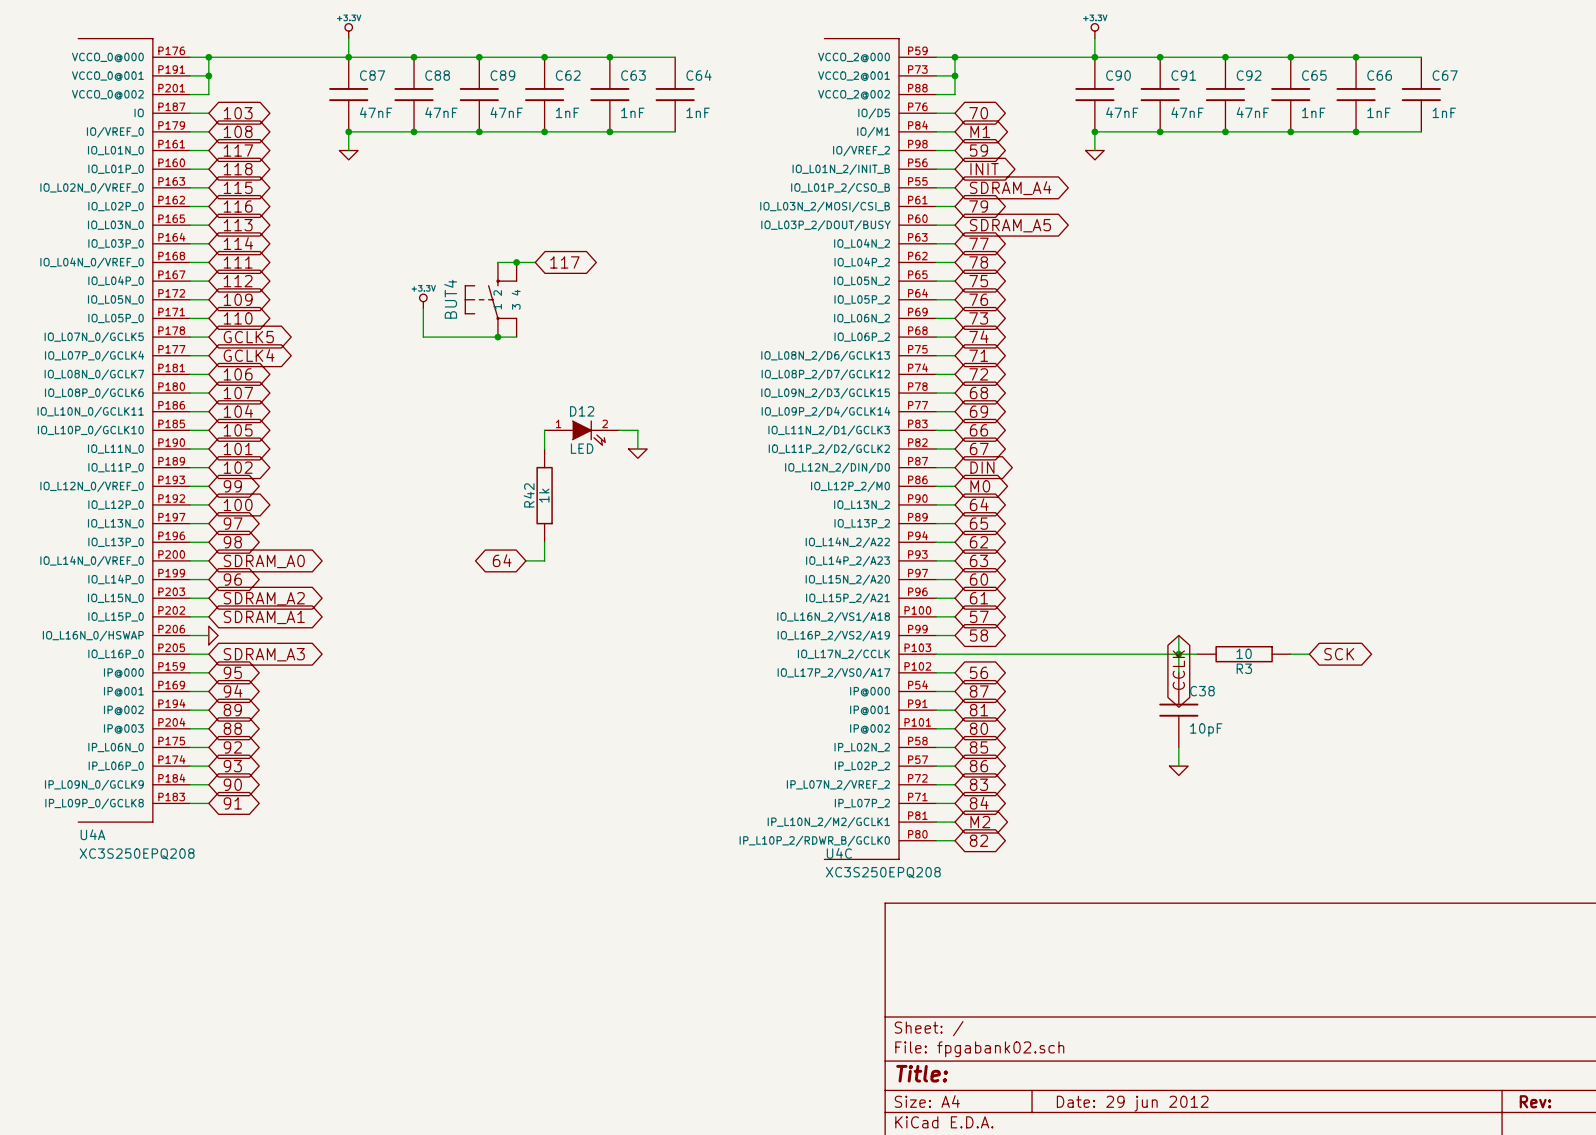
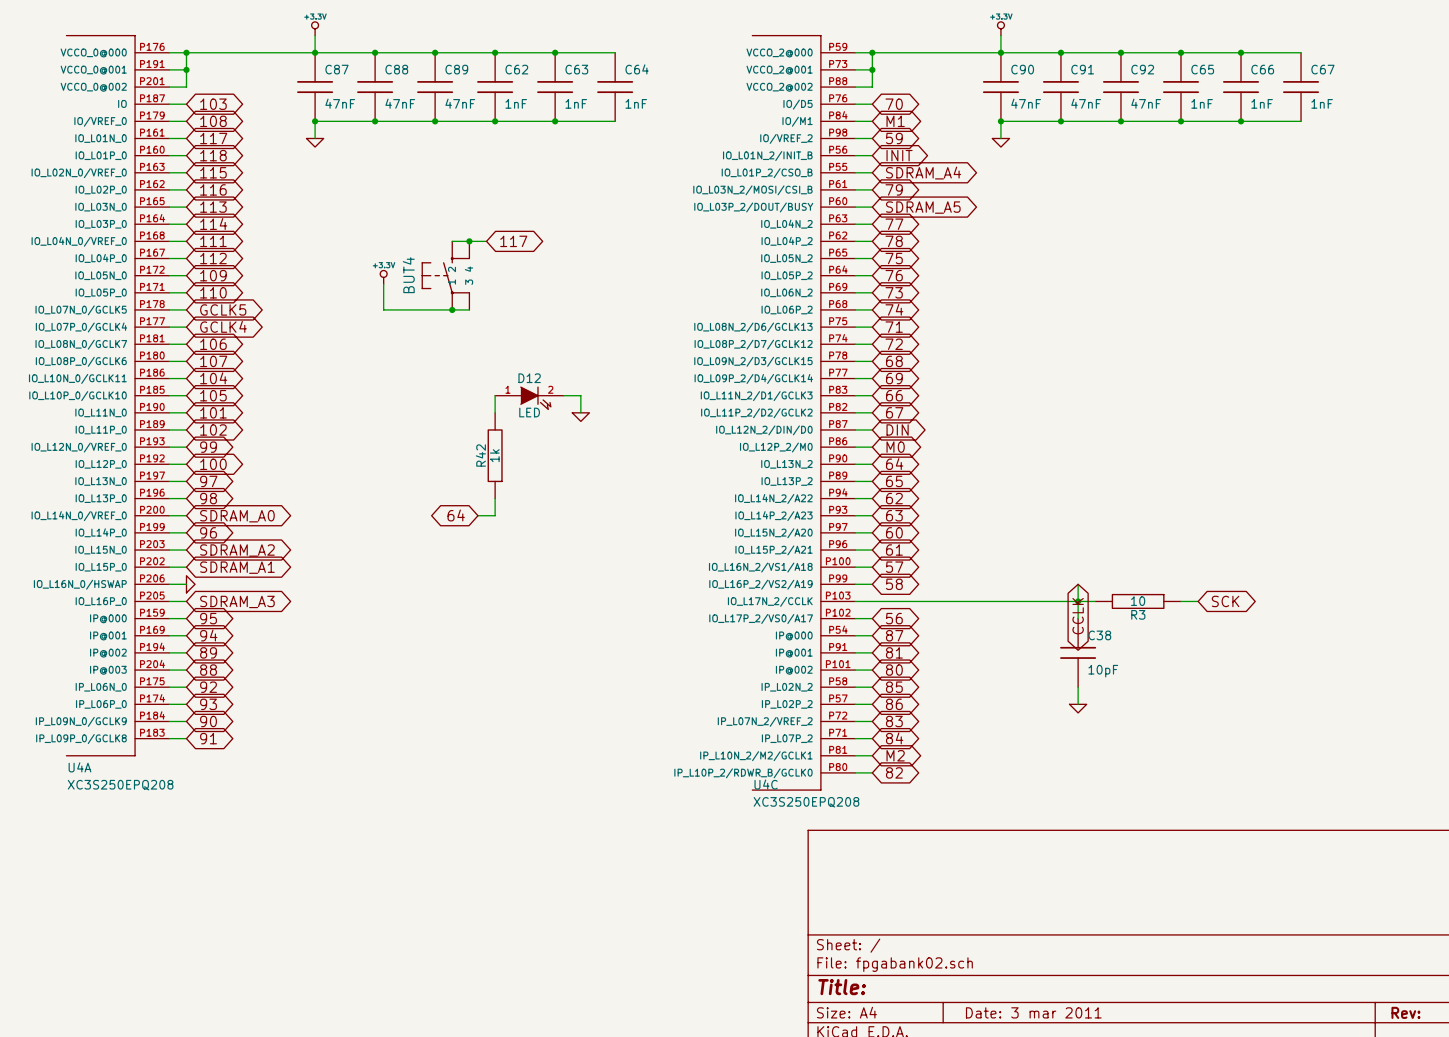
title block: Date: 29 jun 2012 (1132, 1103) -> Date: 3 mar 2011 (1033, 1012)

